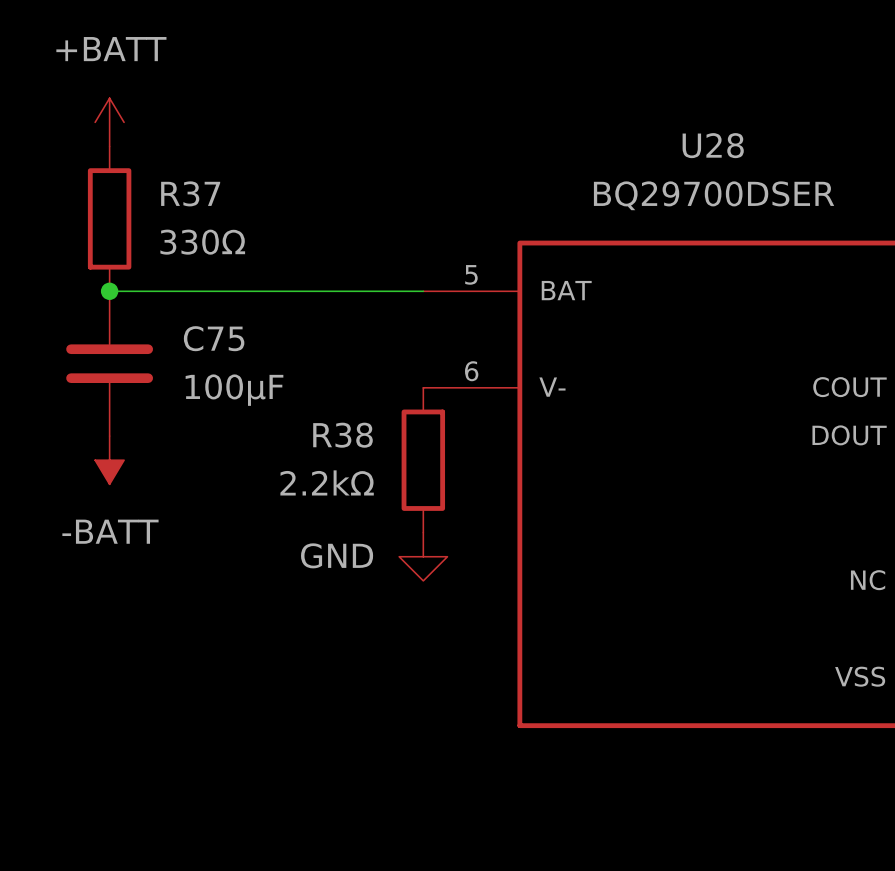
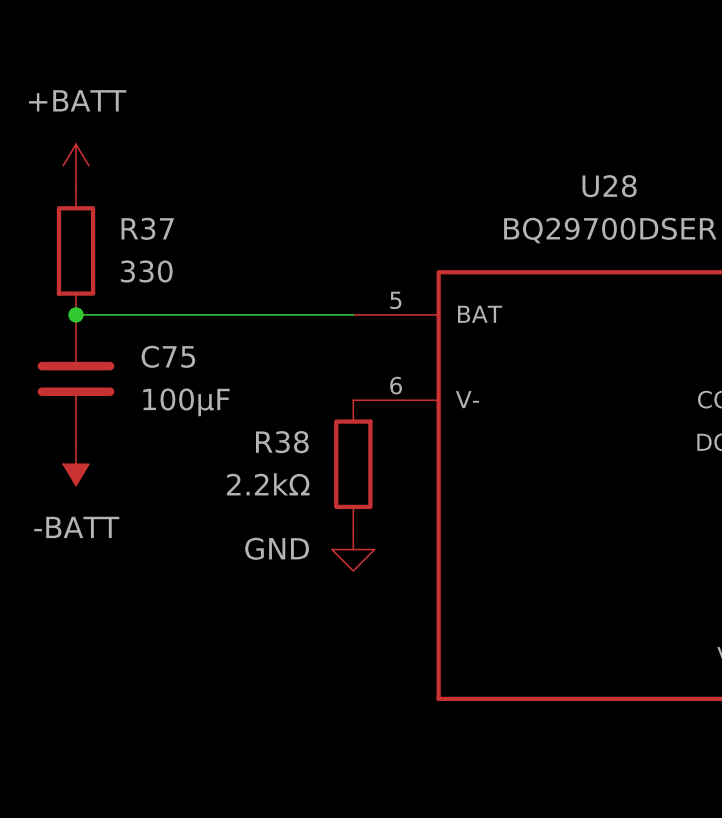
R37 value: 330Ω (202, 242) -> 330 (146, 271)

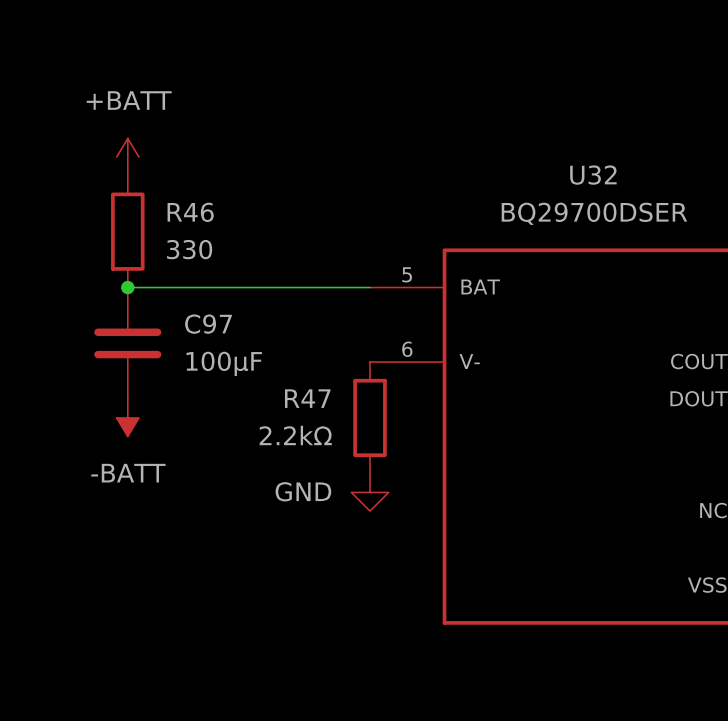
U28 name: U28 (609, 186) -> U32 (593, 175)
R37 name: R37 (147, 228) -> R46 (190, 212)
C75 name: C75 (168, 356) -> C97 (208, 324)
R38 name: R38 (282, 442) -> R47 (307, 398)

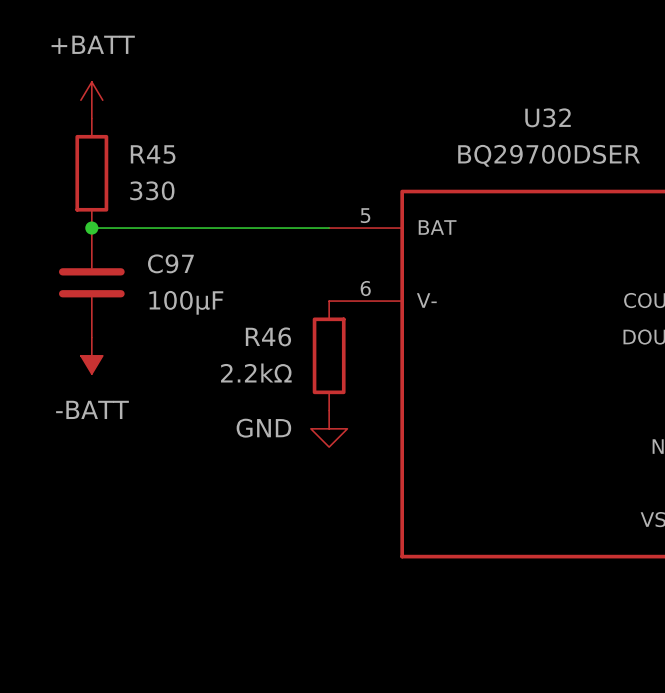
R46 name: R46 (190, 212) -> R45 (153, 154)
R47 name: R47 (307, 398) -> R46 (268, 336)

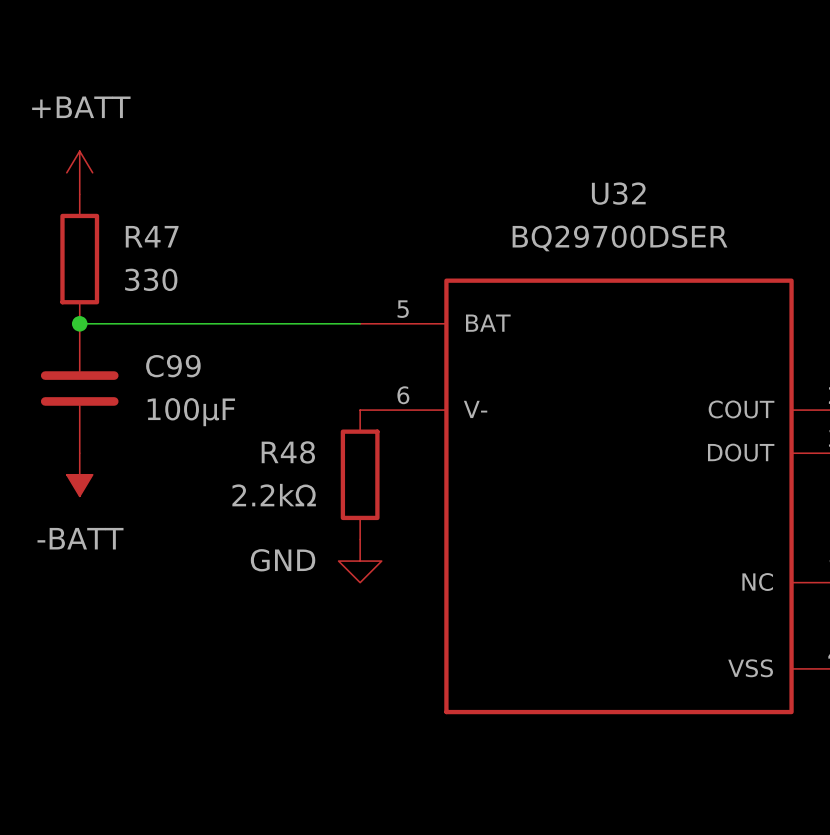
R45 name: R45 (153, 154) -> R47 (152, 236)
C97 name: C97 (170, 263) -> C99 (173, 366)
R46 name: R46 (268, 336) -> R48 (288, 452)

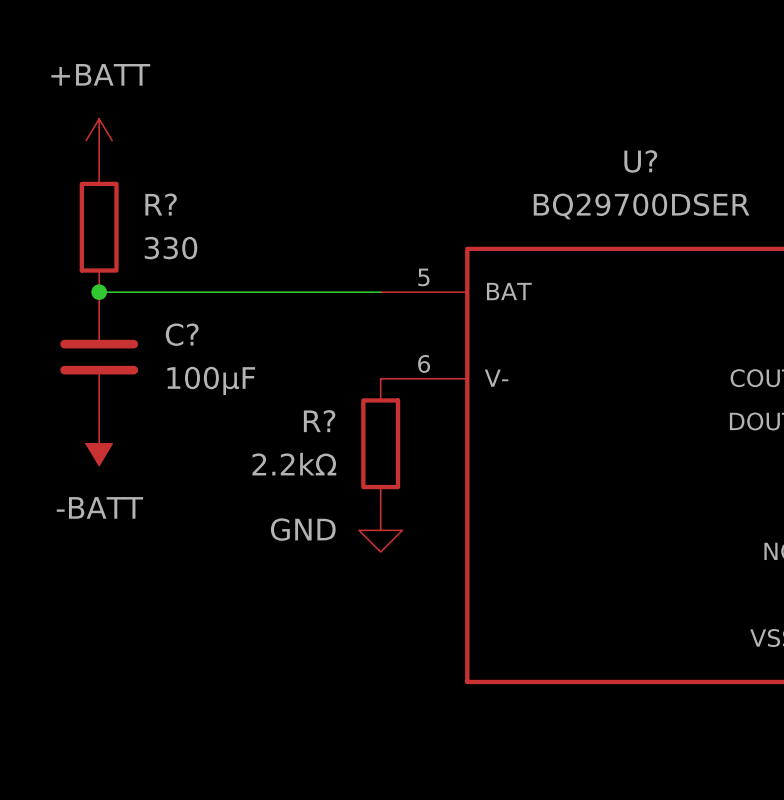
U32 name: U32 (618, 193) -> U? (640, 161)
R47 name: R47 (152, 236) -> R? (161, 204)
C99 name: C99 (173, 366) -> C? (182, 334)
R48 name: R48 (288, 452) -> R? (319, 421)

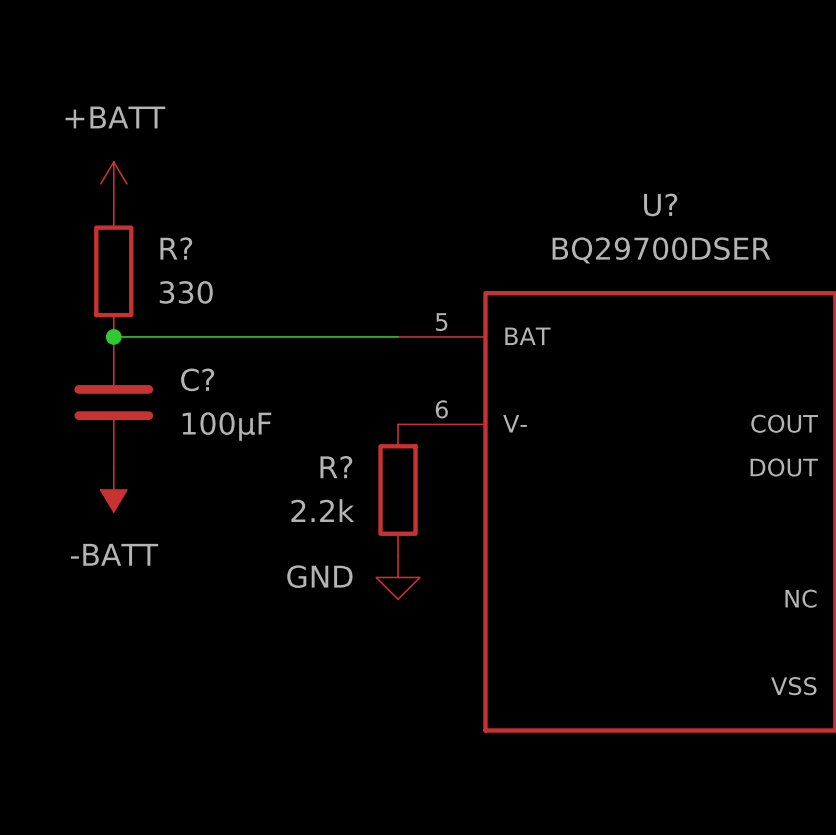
R? value: 2.2kΩ (294, 464) -> 2.2k (322, 510)

